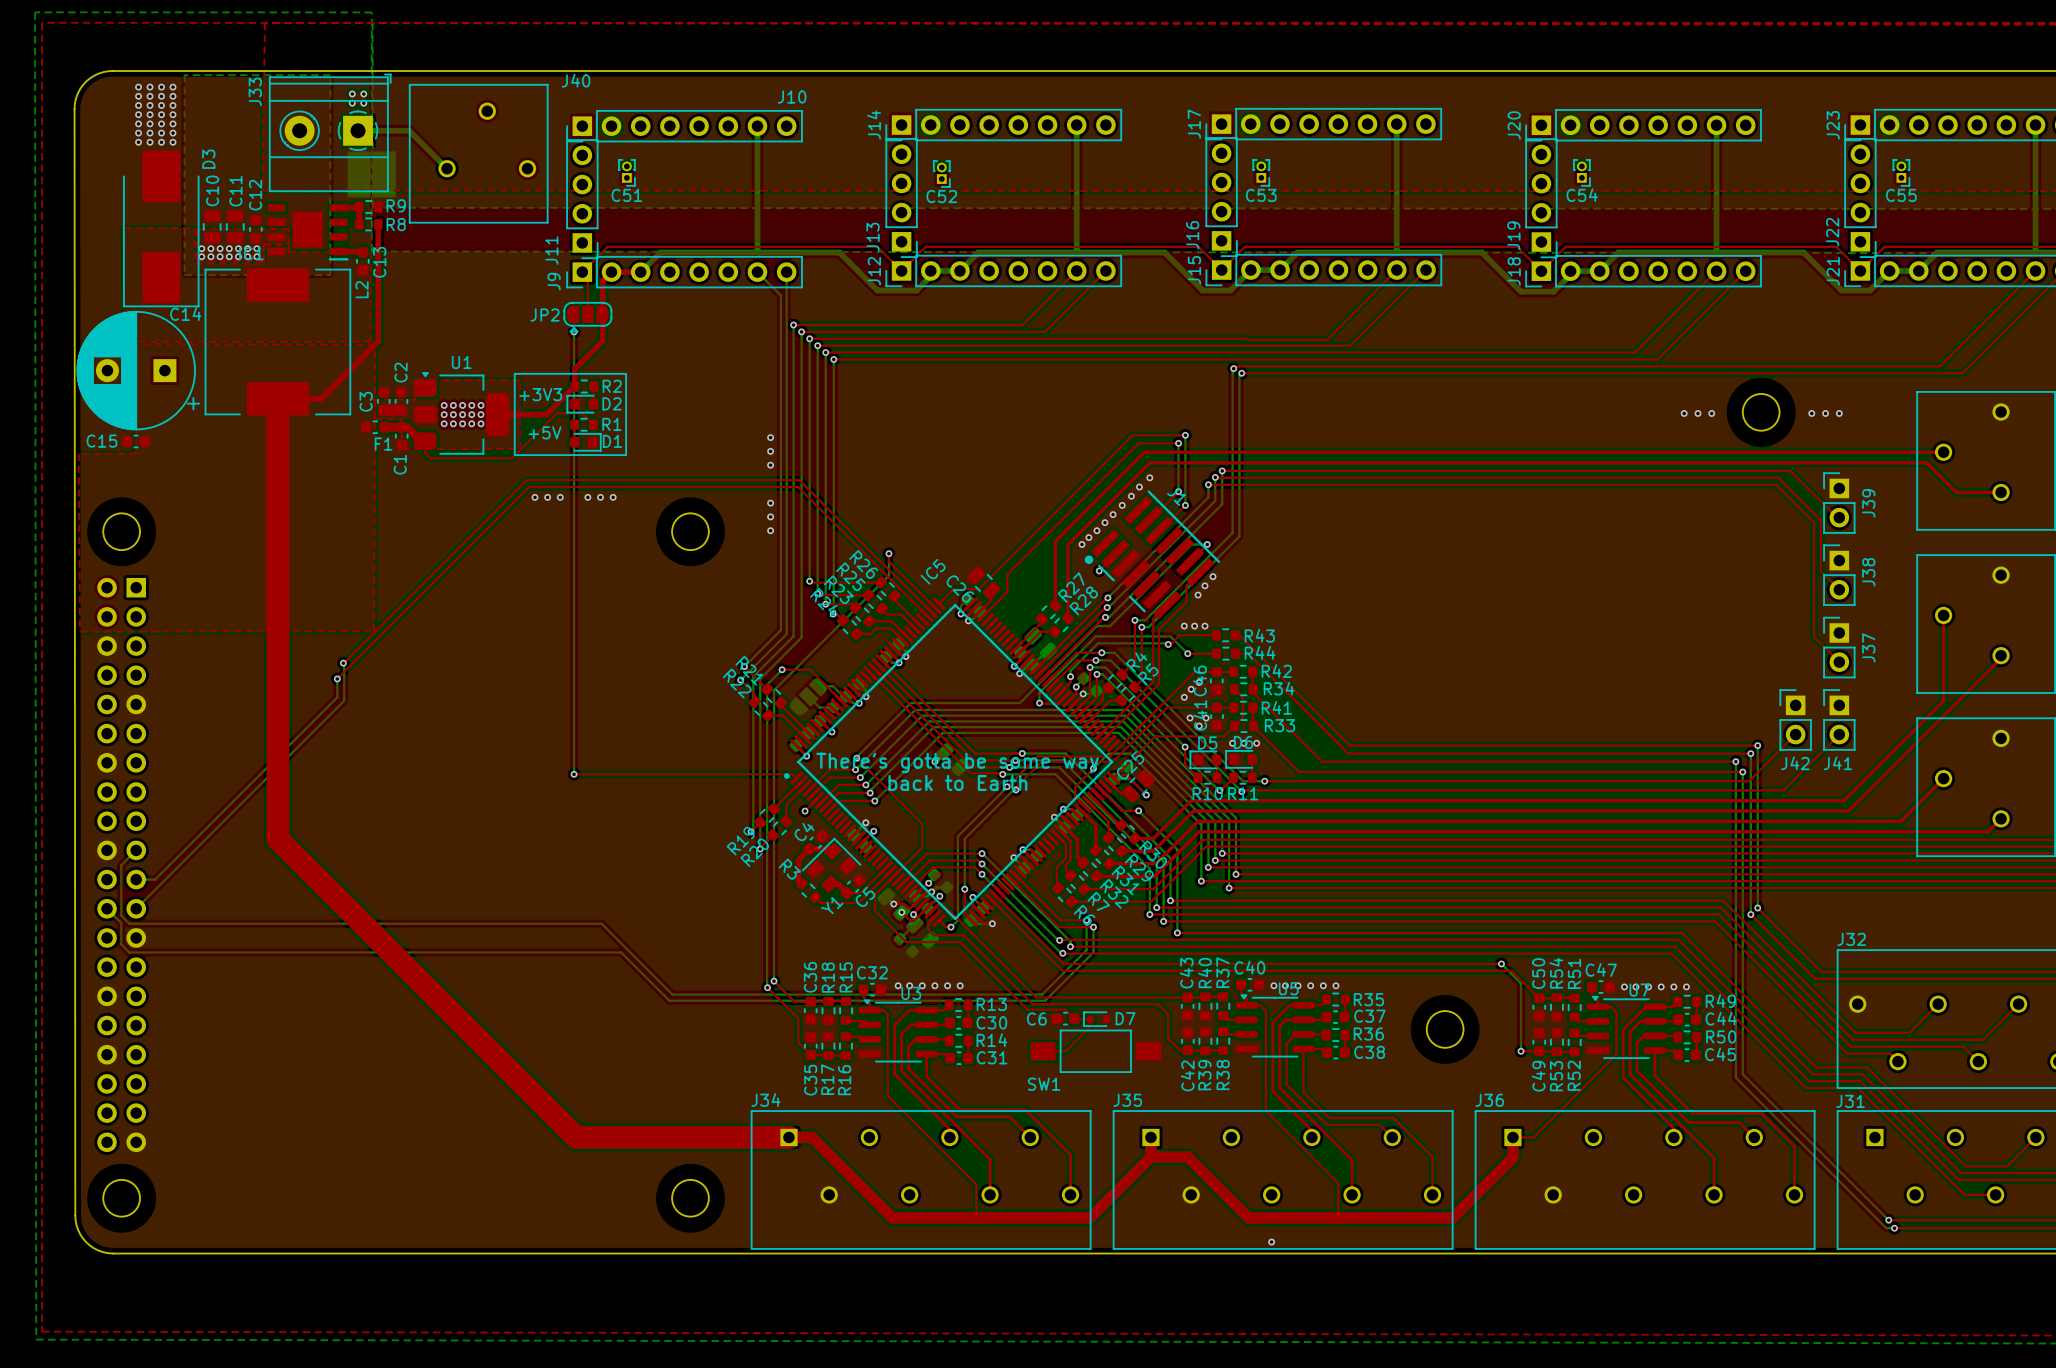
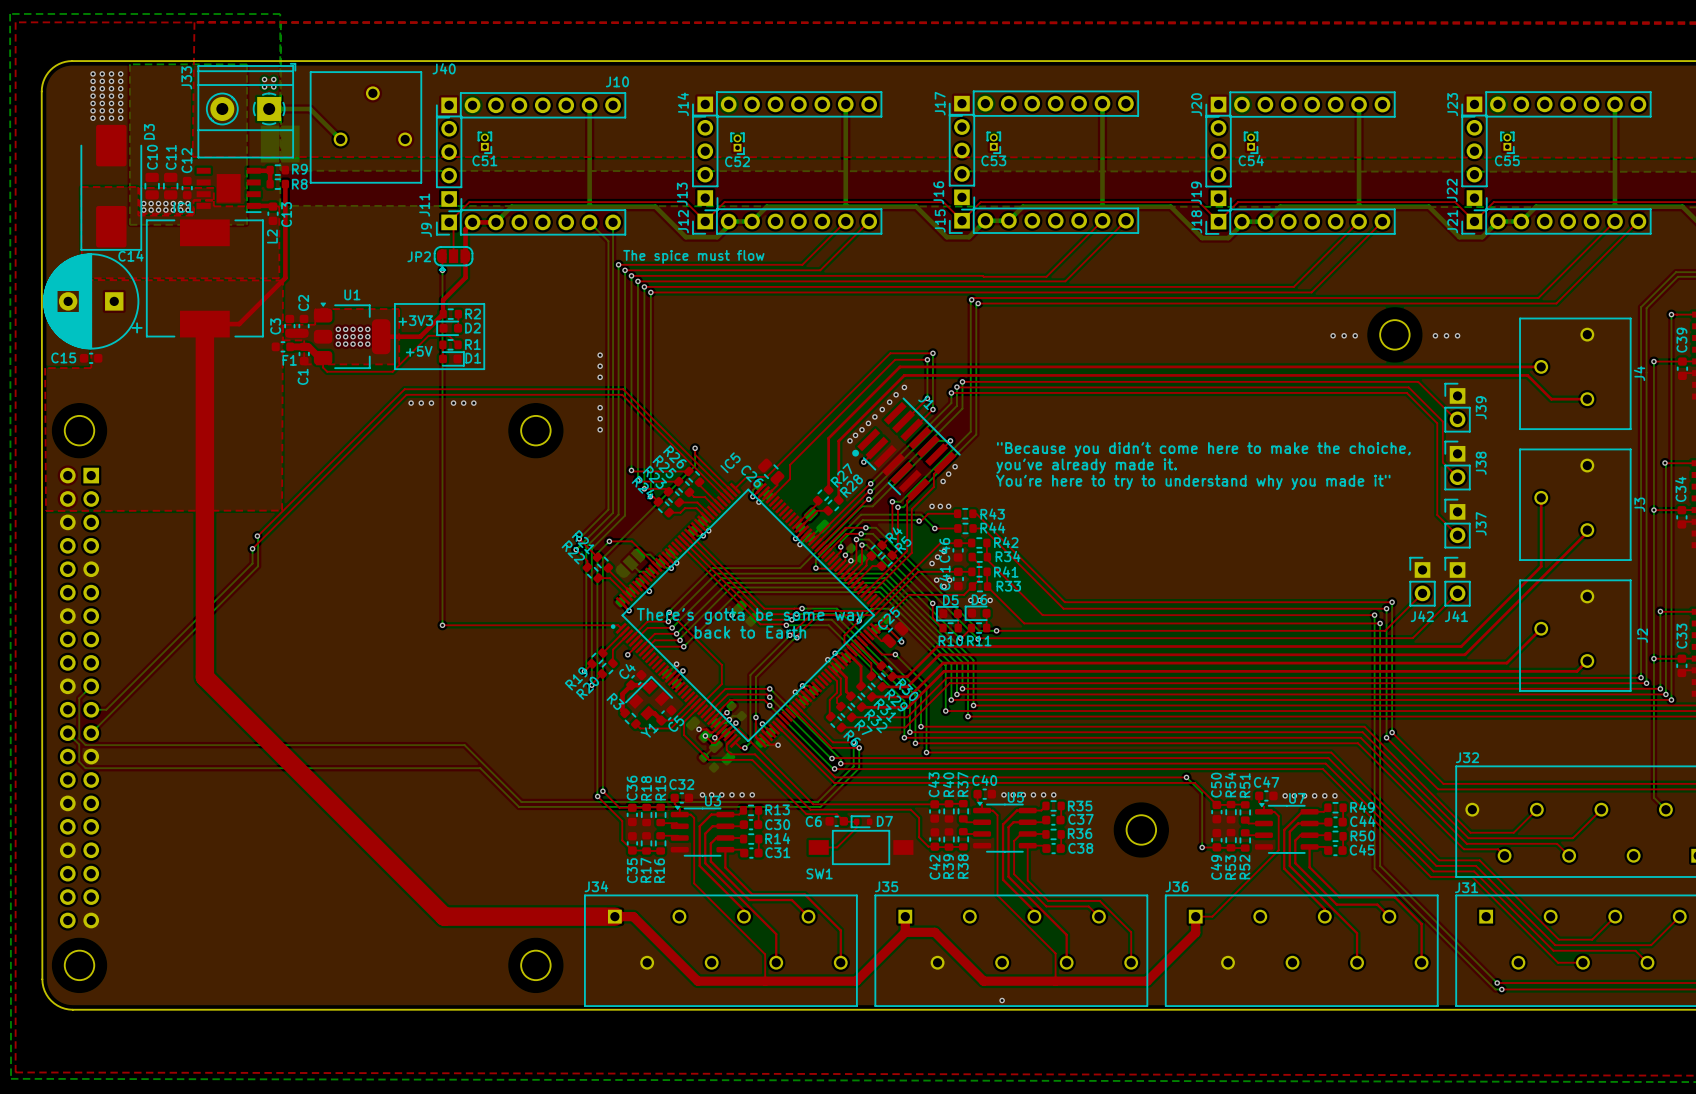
text: none -> The spice must flow (693, 256)
text: none -> "Because you didn't come here to make the choiche, (1203, 449)
text: none -> you've already made it. (1086, 466)
text: none -> You're here to try to understand why you made it" (1193, 482)

